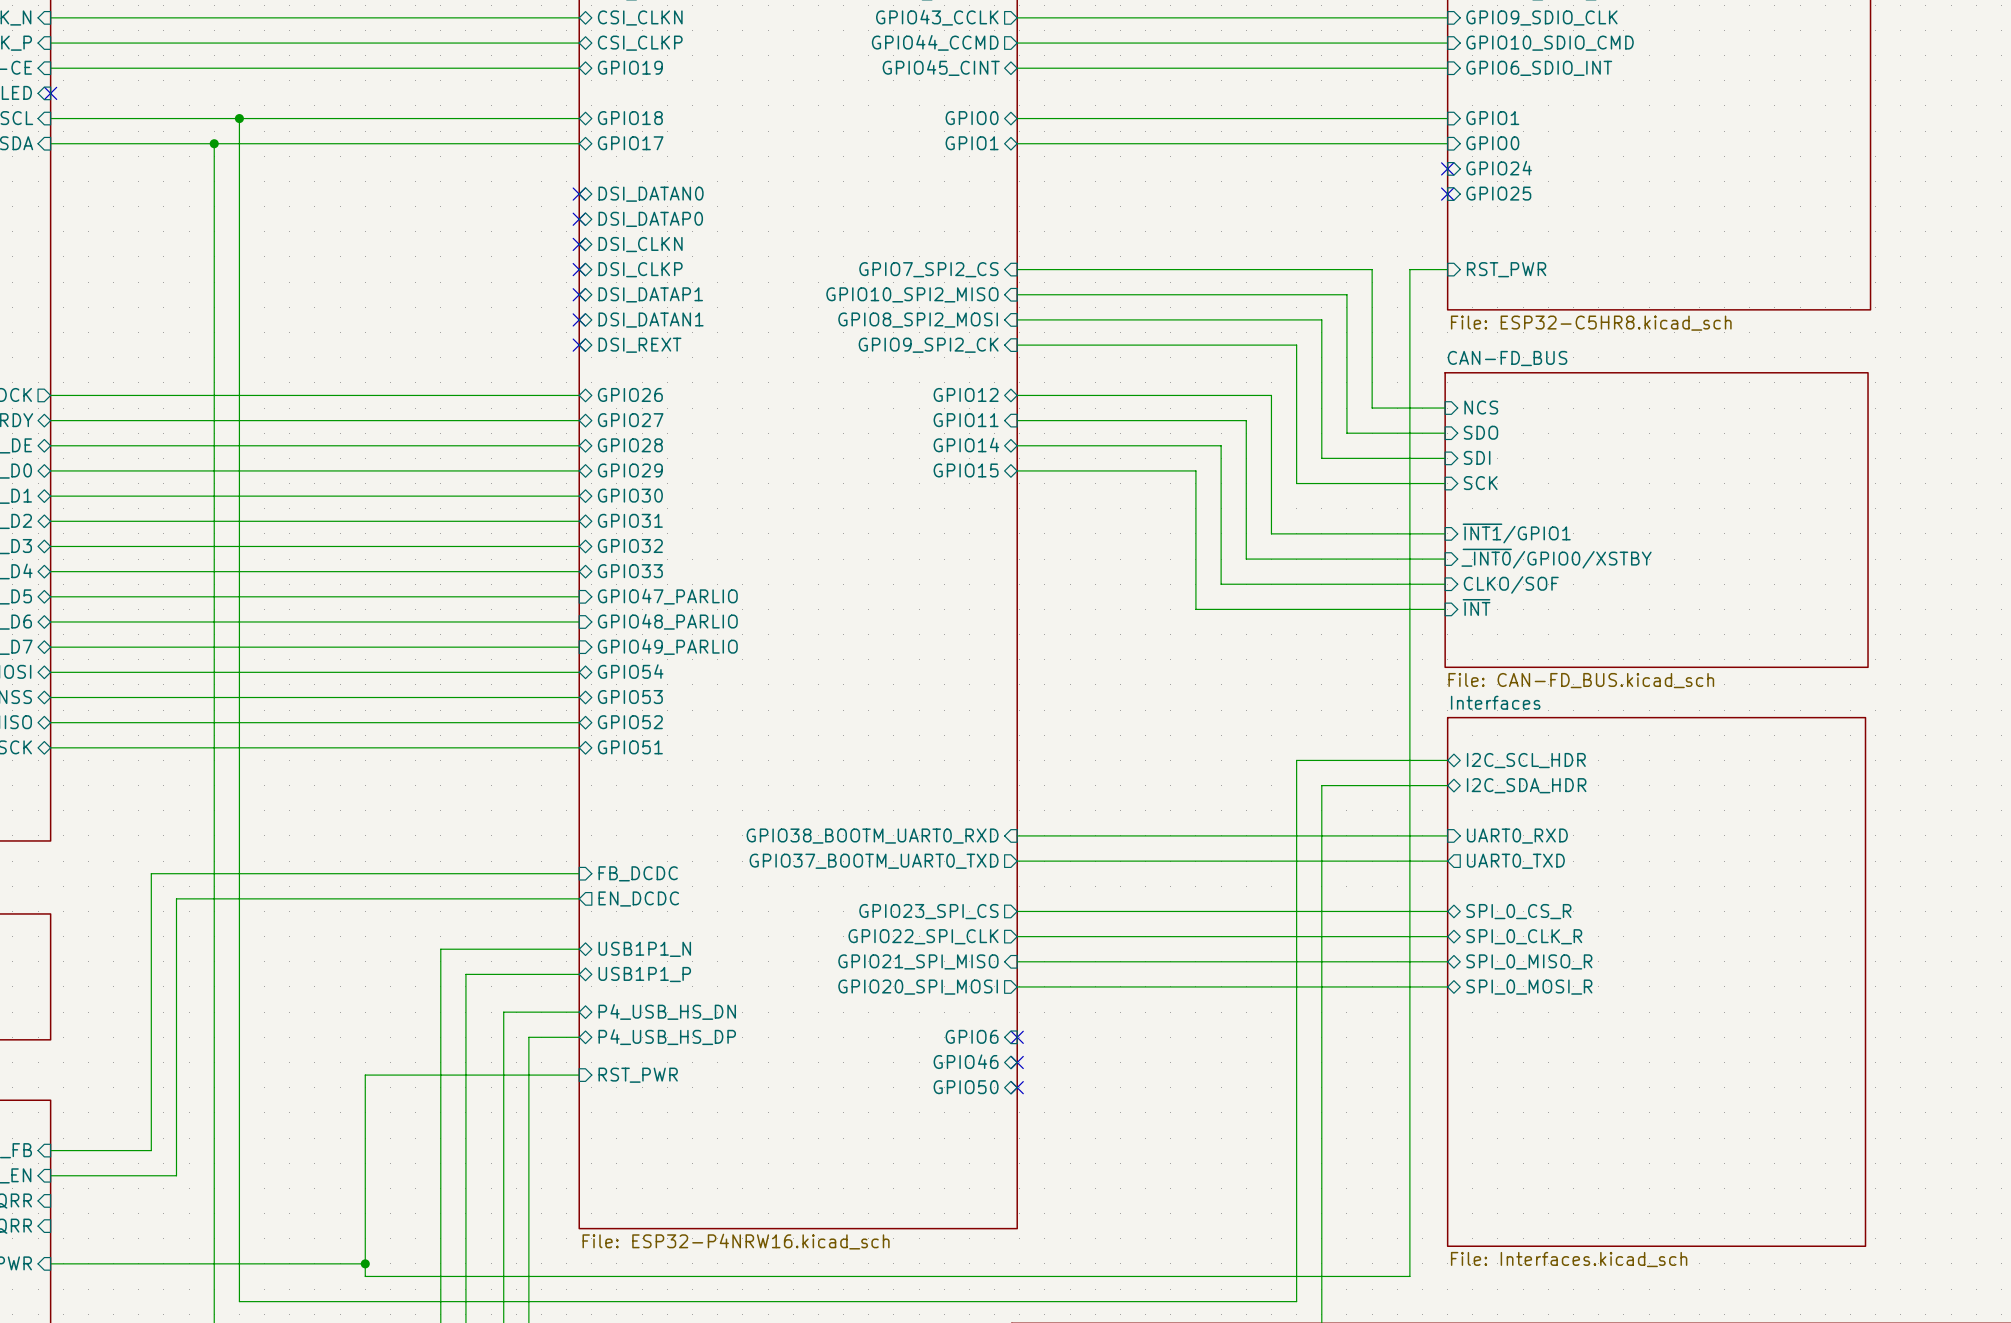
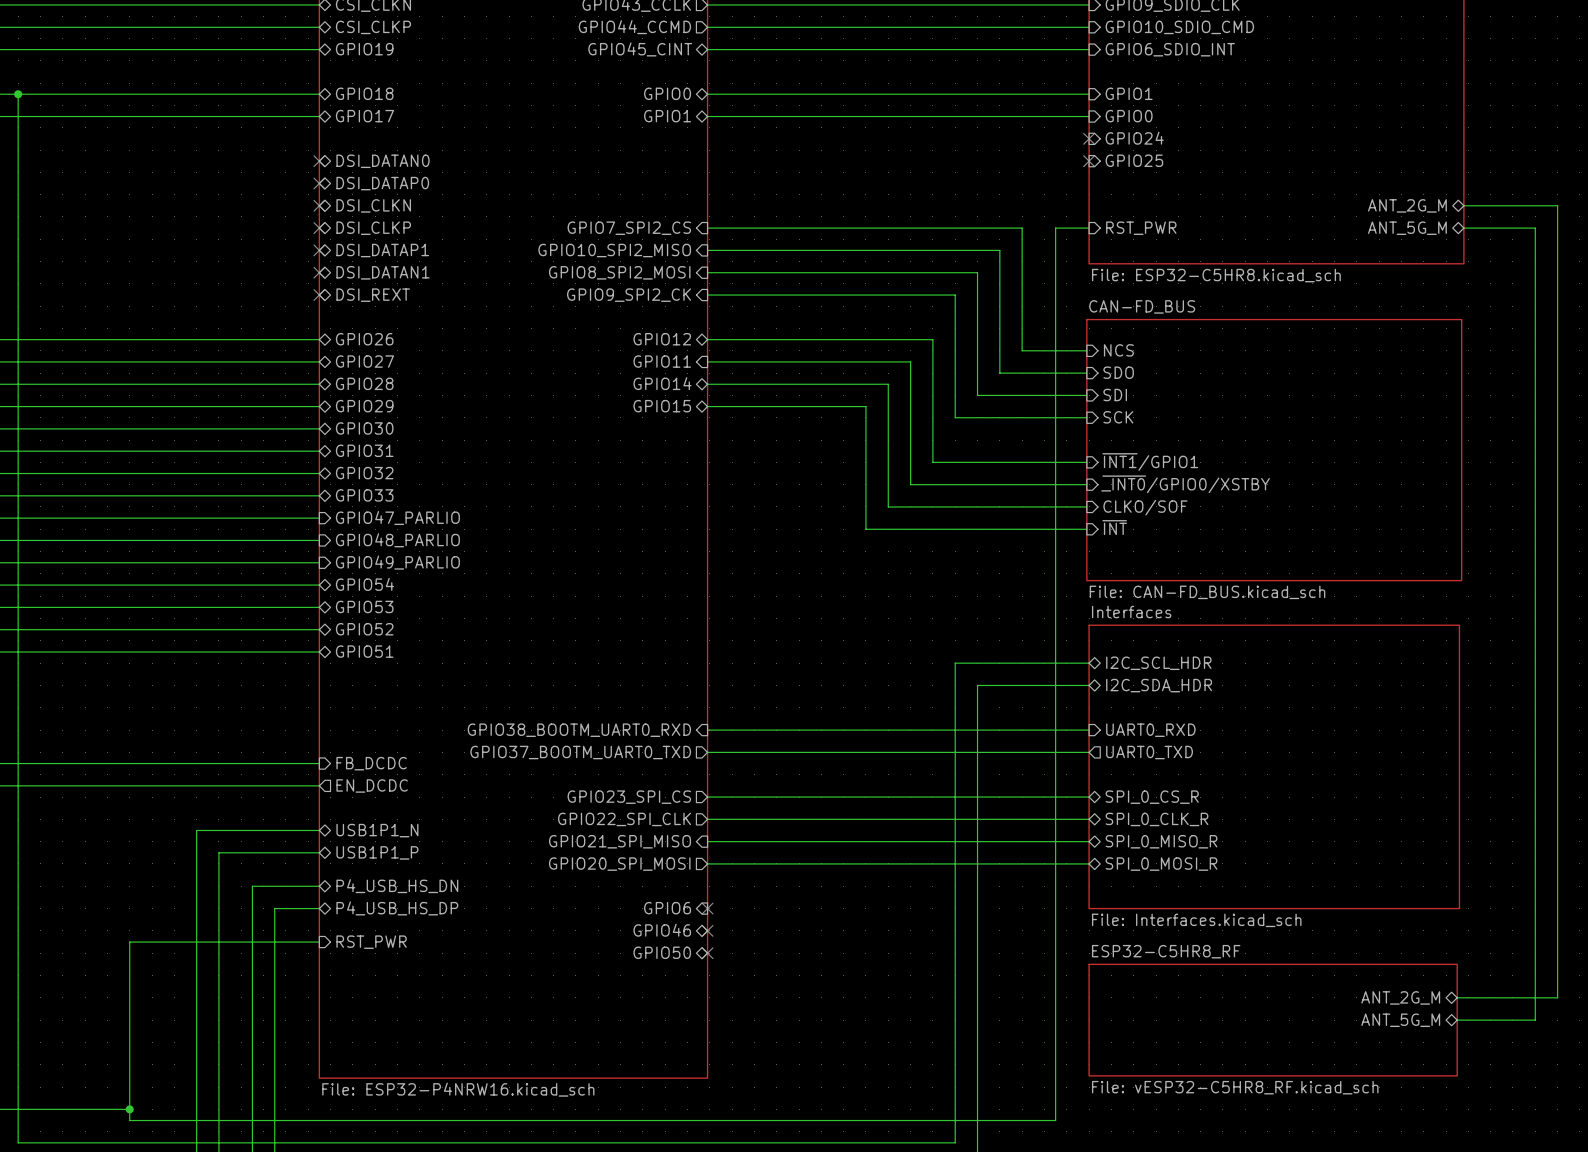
sheet pin: none -> ANT_2G_M (1407, 205)
wire: none -> (1463, 205) (1557, 205) (1557, 997) (1457, 997)
sheet pin: none -> ANT_5G_M (1407, 228)
wire: none -> (1463, 228) (1535, 228) (1535, 1020) (1457, 1020)
sheet Interfaces: none -> File: Interfaces.kicad_sch (1274, 766)
sheet Interfaces: File: Interfaces.kicad_sch (1656, 981) -> none
sheet pin: none -> ANT_2G_M (1400, 997)
sheet ESP32-C5HR8_RF: none -> File: vESP32-C5HR8_RF.kicad_sch (1273, 1020)
sheet pin: none -> ANT_5G_M (1400, 1020)

